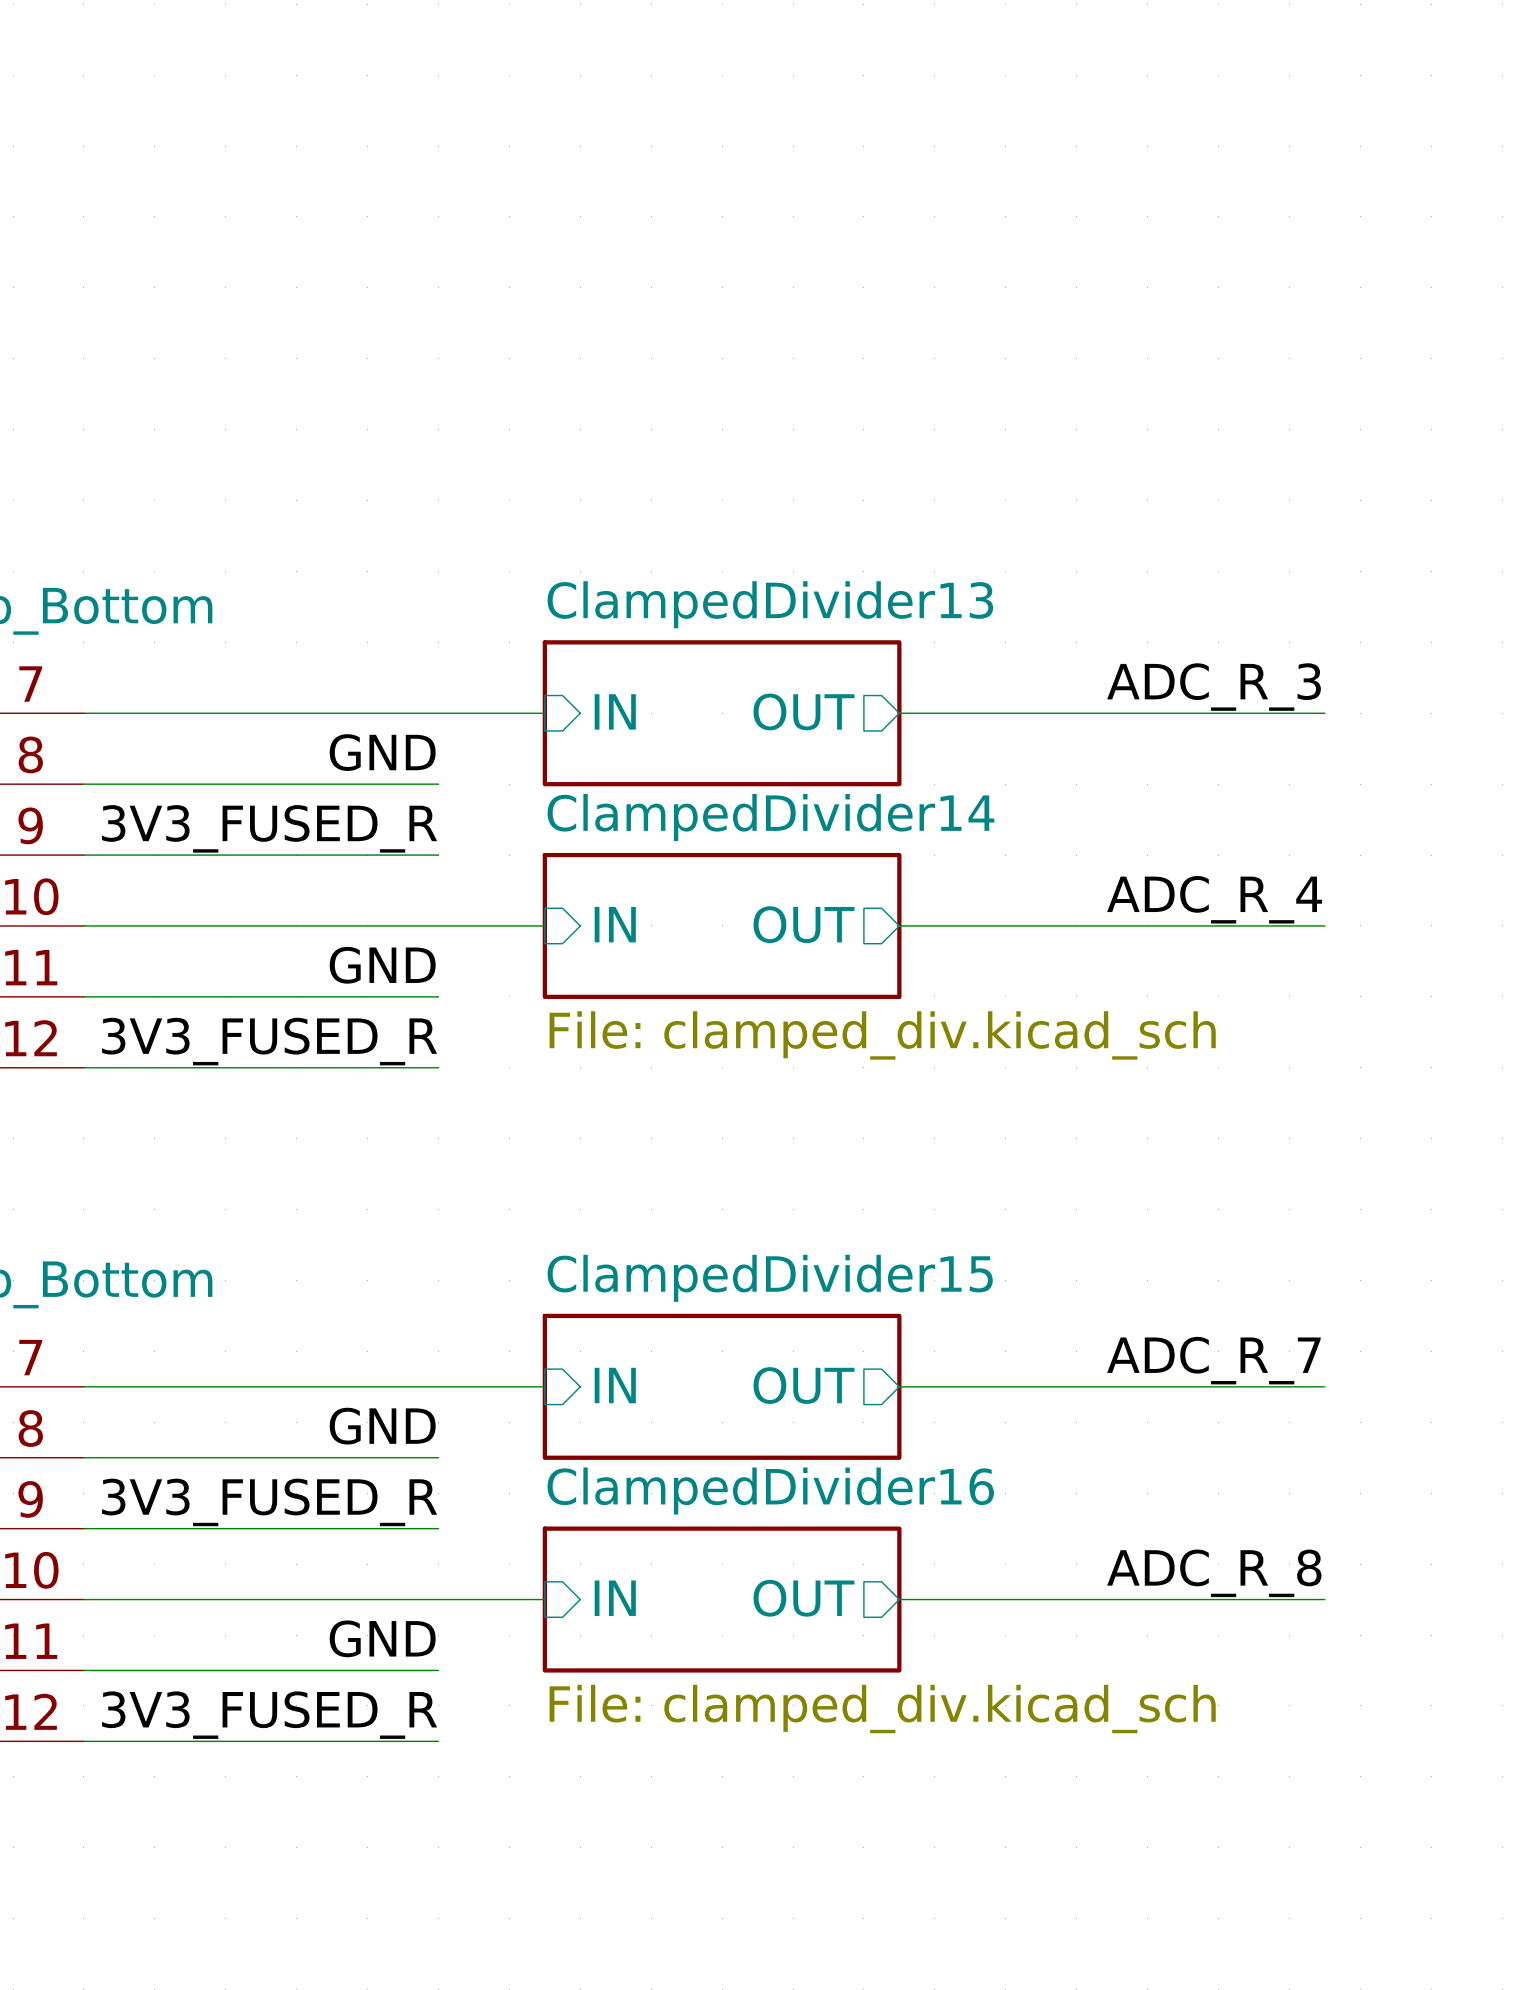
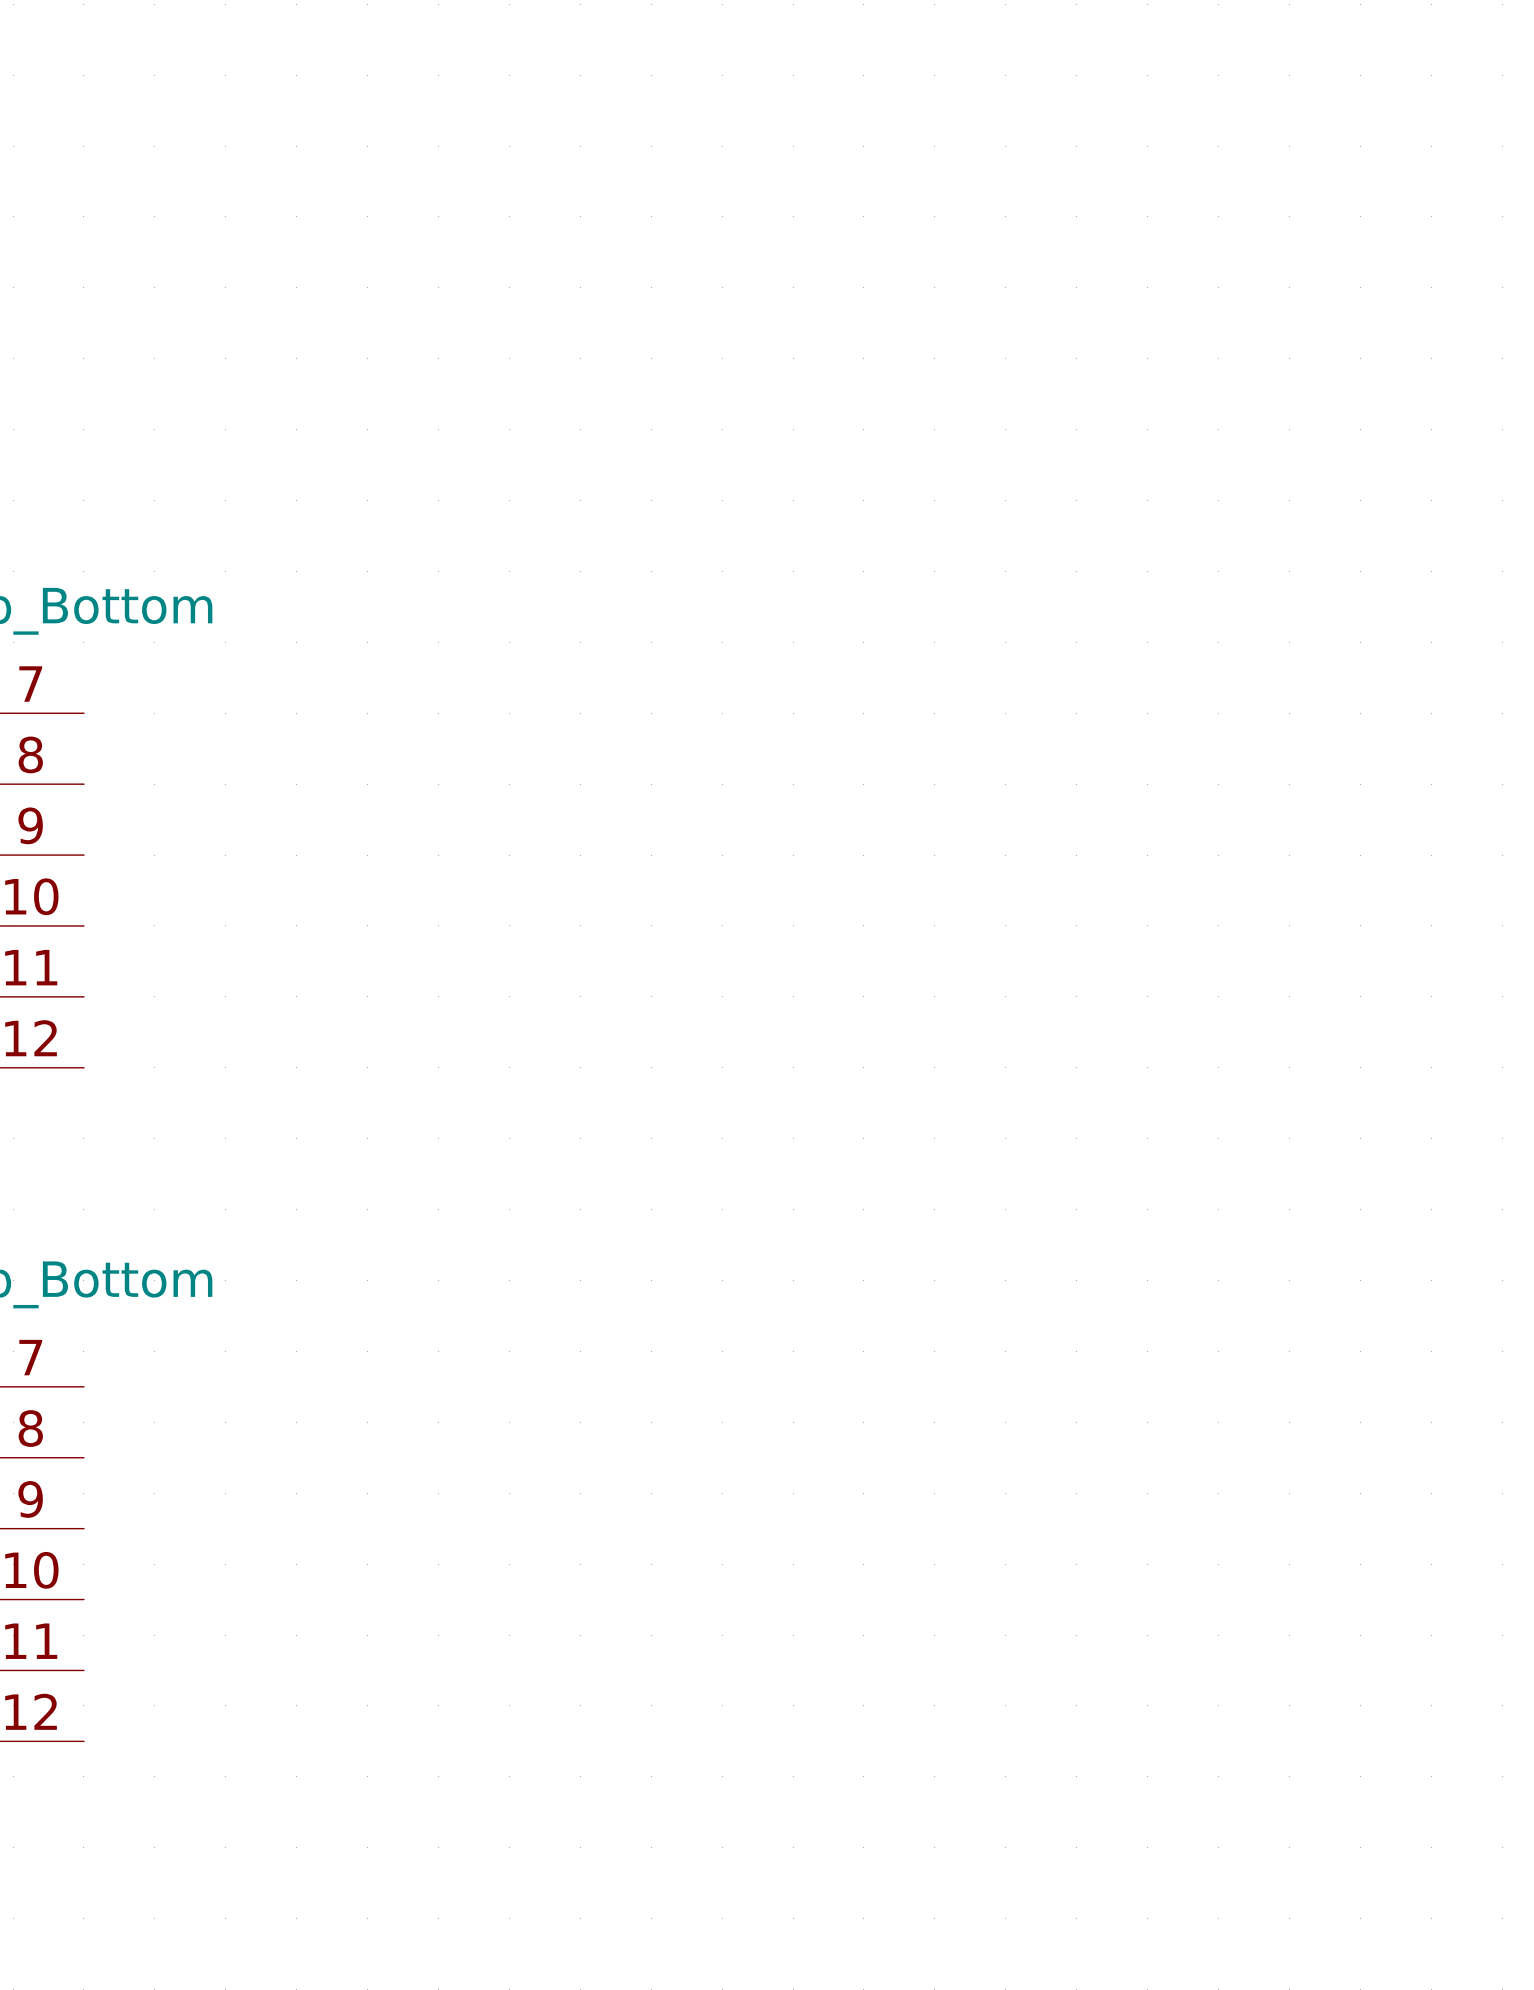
label: ADC_R_3 (1214, 687) -> none
sheet pin: IN (615, 711) -> none
sheet pin: OUT (804, 711) -> none
wire: (83, 713) (544, 713) -> none
sheet ClampedDivider13: (722, 713) -> none
wire: (899, 713) (1324, 713) -> none
label: GND (382, 752) -> none
wire: (83, 784) (438, 784) -> none
label: 3V3_FUSED_R (269, 828) -> none
wire: (83, 855) (438, 855) -> none
label: ADC_R_4 (1214, 899) -> none
sheet pin: IN (615, 924) -> none
sheet pin: OUT (804, 924) -> none
wire: (83, 925) (544, 925) -> none
sheet ClampedDivider14: File: clamped_div.kicad_sch (722, 925) -> none
wire: (899, 925) (1324, 925) -> none
label: GND (382, 965) -> none
wire: (83, 996) (438, 996) -> none
label: 3V3_FUSED_R (269, 1041) -> none
wire: (83, 1067) (438, 1067) -> none
label: ADC_R_7 (1213, 1360) -> none
sheet pin: IN (615, 1385) -> none
sheet pin: OUT (804, 1385) -> none
wire: (83, 1386) (544, 1386) -> none
sheet ClampedDivider15: (722, 1386) -> none
wire: (899, 1386) (1324, 1386) -> none
label: GND (382, 1426) -> none
wire: (83, 1457) (438, 1457) -> none
label: 3V3_FUSED_R (269, 1502) -> none
wire: (83, 1528) (438, 1528) -> none
label: ADC_R_8 (1214, 1573) -> none
sheet pin: IN (615, 1598) -> none
sheet pin: OUT (804, 1598) -> none
wire: (83, 1599) (544, 1599) -> none
sheet ClampedDivider16: File: clamped_div.kicad_sch (722, 1599) -> none
wire: (899, 1599) (1324, 1599) -> none
label: GND (382, 1638) -> none
wire: (83, 1670) (438, 1670) -> none
label: 3V3_FUSED_R (269, 1715) -> none
wire: (83, 1741) (438, 1741) -> none

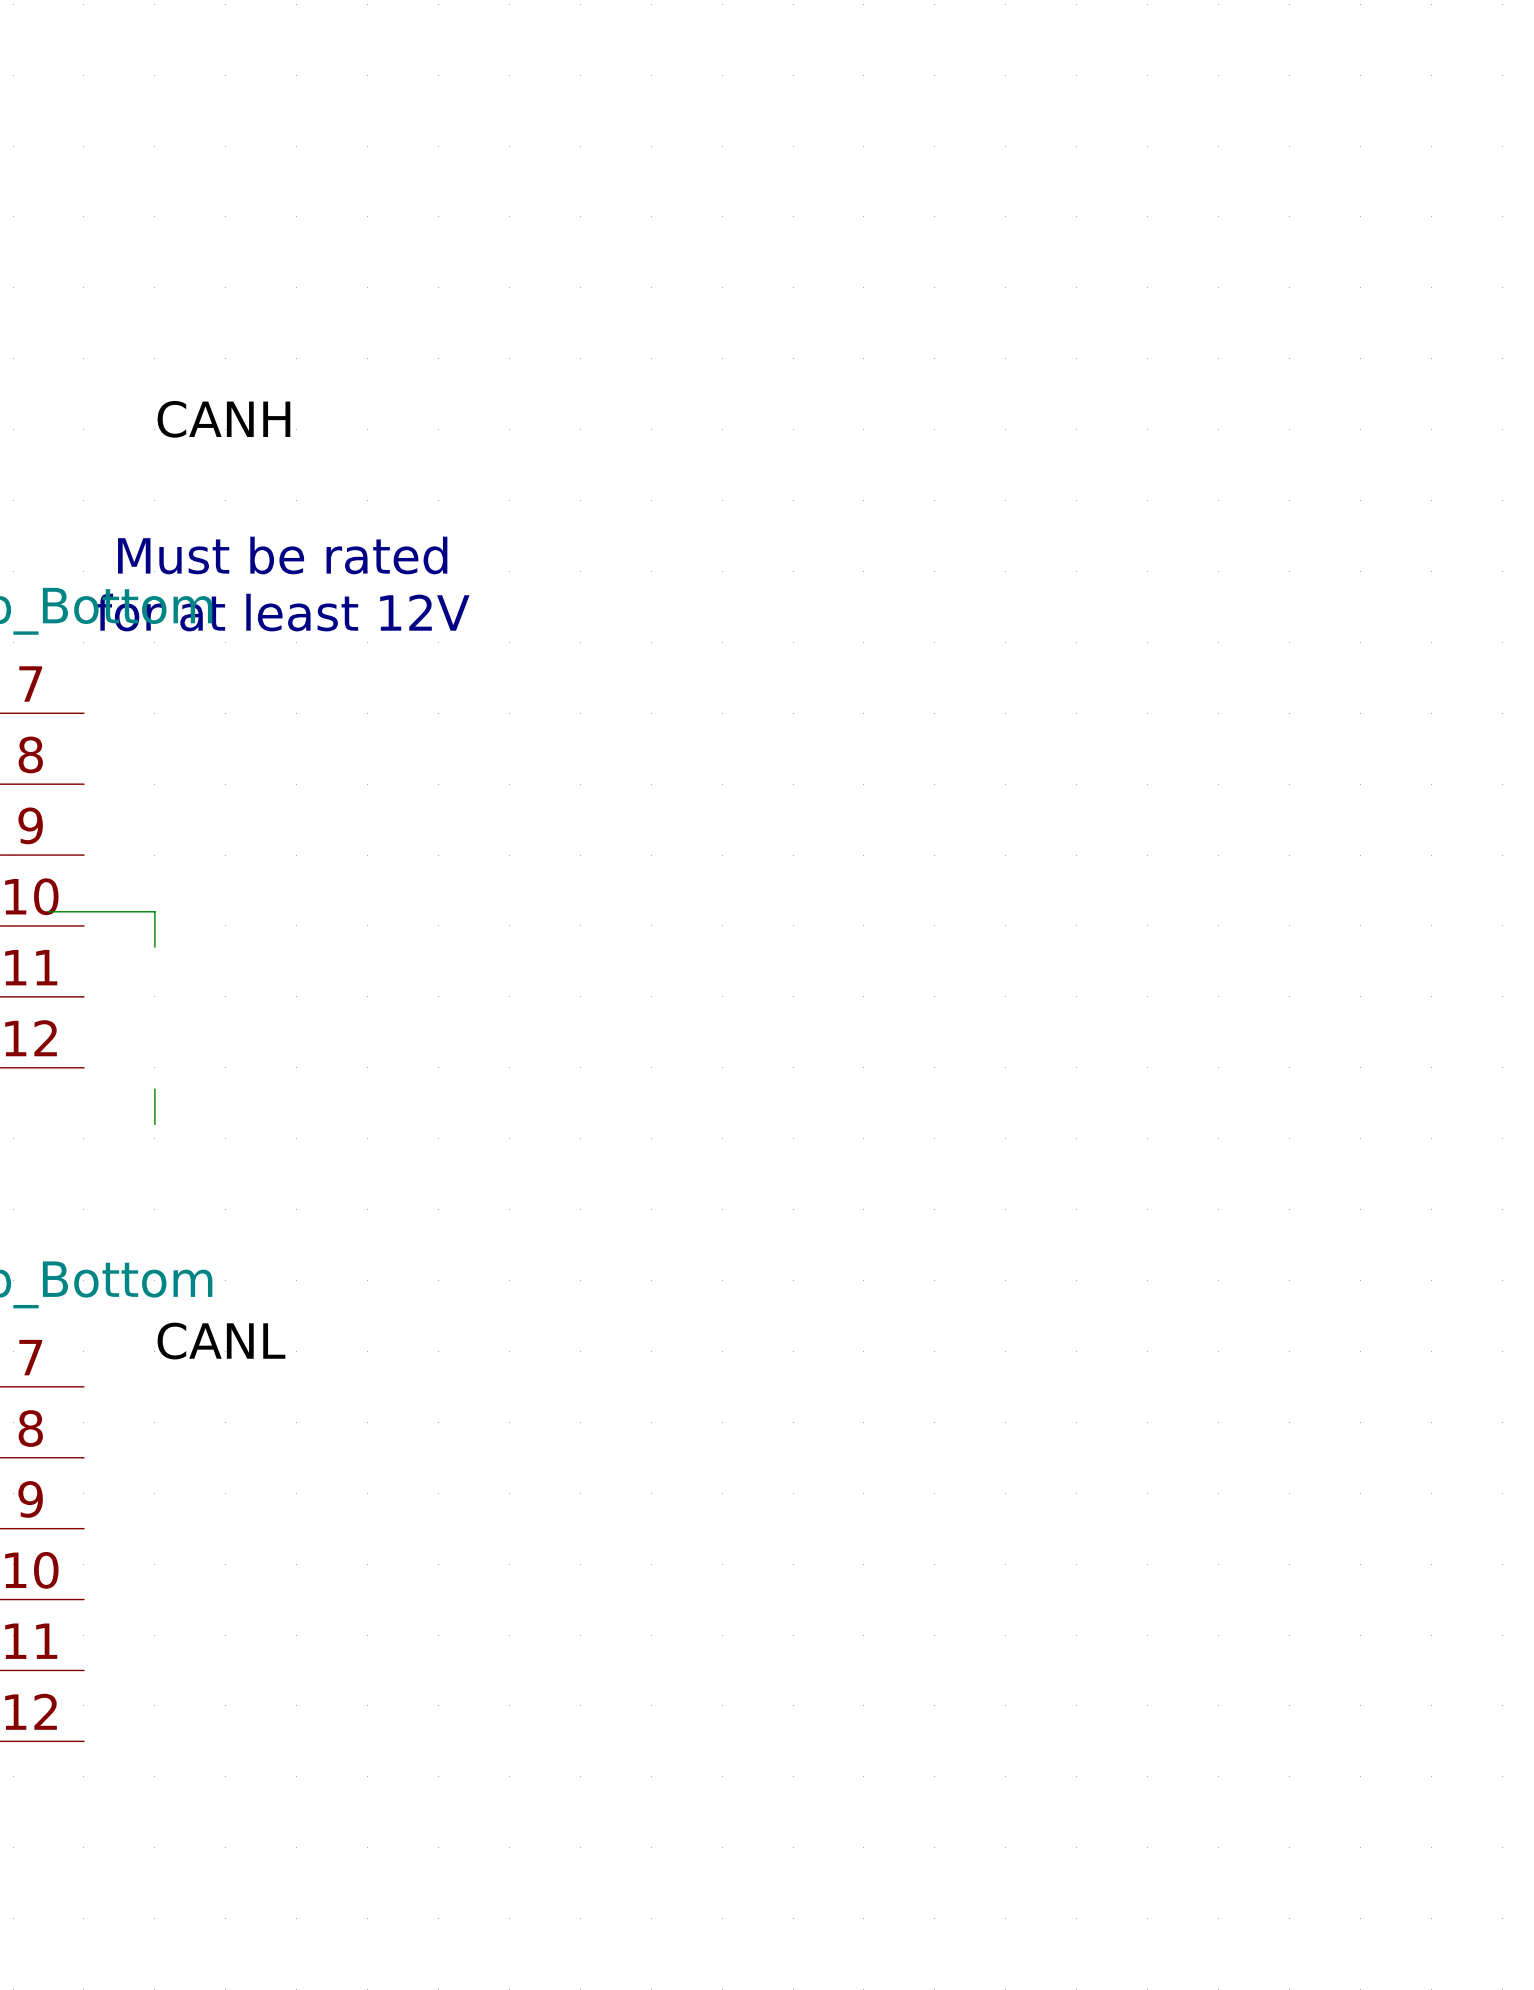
label: none -> CANH (223, 419)
text: none -> Must be rated (282, 555)
text: none -> for at least 12V (282, 612)
wire: none -> (48, 911) (154, 911) (154, 947)
wire: none -> (154, 1089) (154, 1124)
label: none -> CANL (221, 1341)

